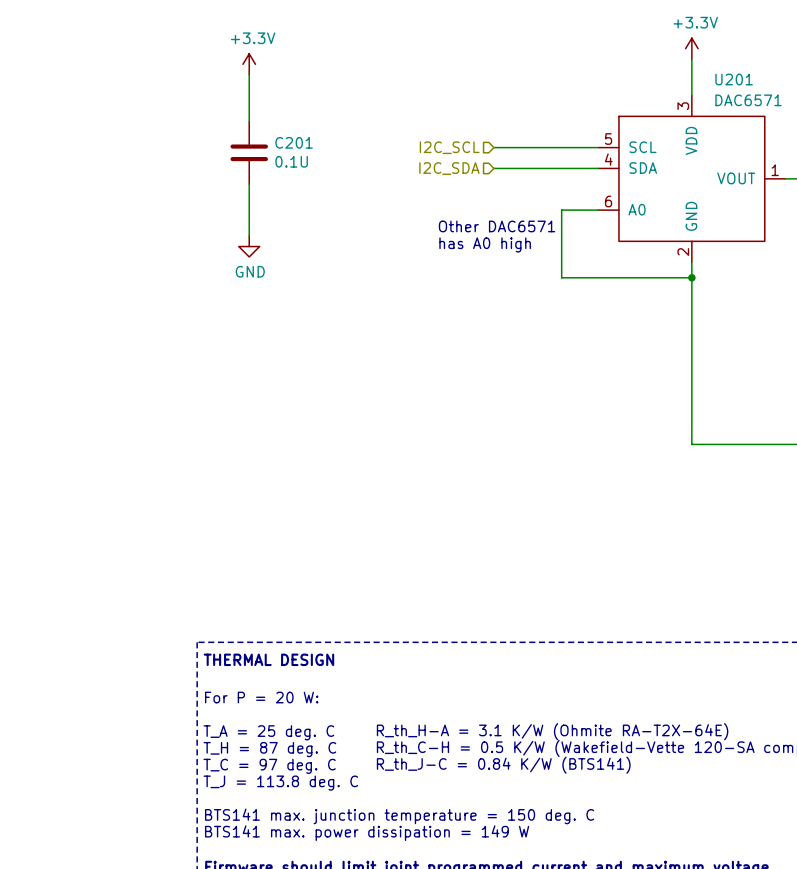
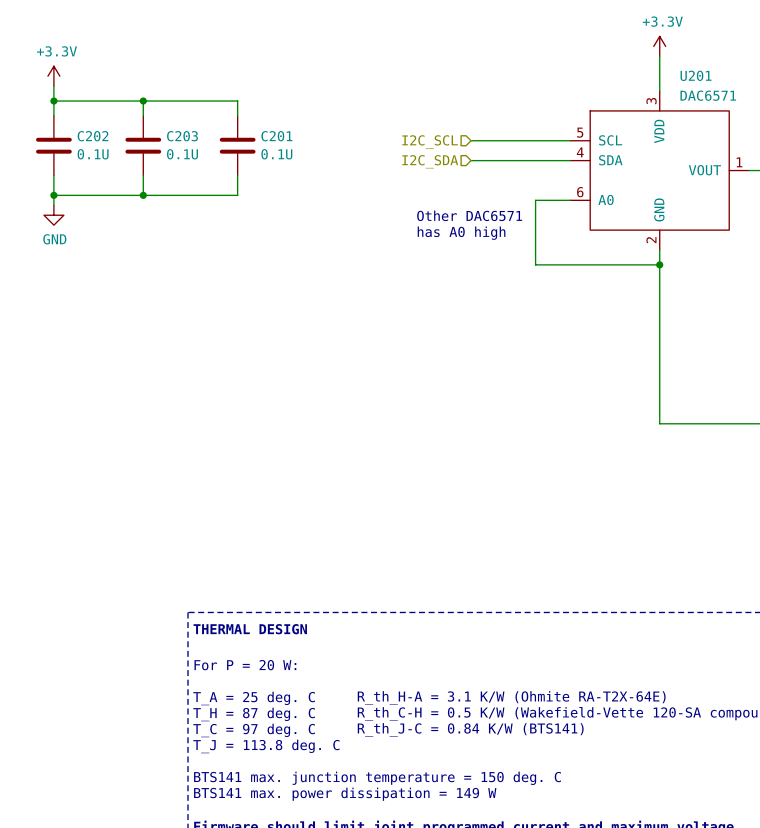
power symbol position: +3.3V (249, 64) -> +3.3V (53, 76)
wire: (249, 74) (249, 105) -> (53, 101) (237, 101)
wire: none -> (53, 86) (53, 115)
junction: none -> (53, 101)
wire: none -> (143, 101) (143, 115)
junction: none -> (143, 101)
C202: none -> 0.1U (53, 145)
C203: none -> 0.1U (143, 145)
wire: none -> (53, 175) (53, 205)
wire: none -> (143, 175) (143, 195)
junction: none -> (53, 195)
junction: none -> (143, 195)
wire: (249, 204) (249, 236) -> (237, 195) (53, 195)
power symbol position: GND (249, 246) -> GND (53, 215)

